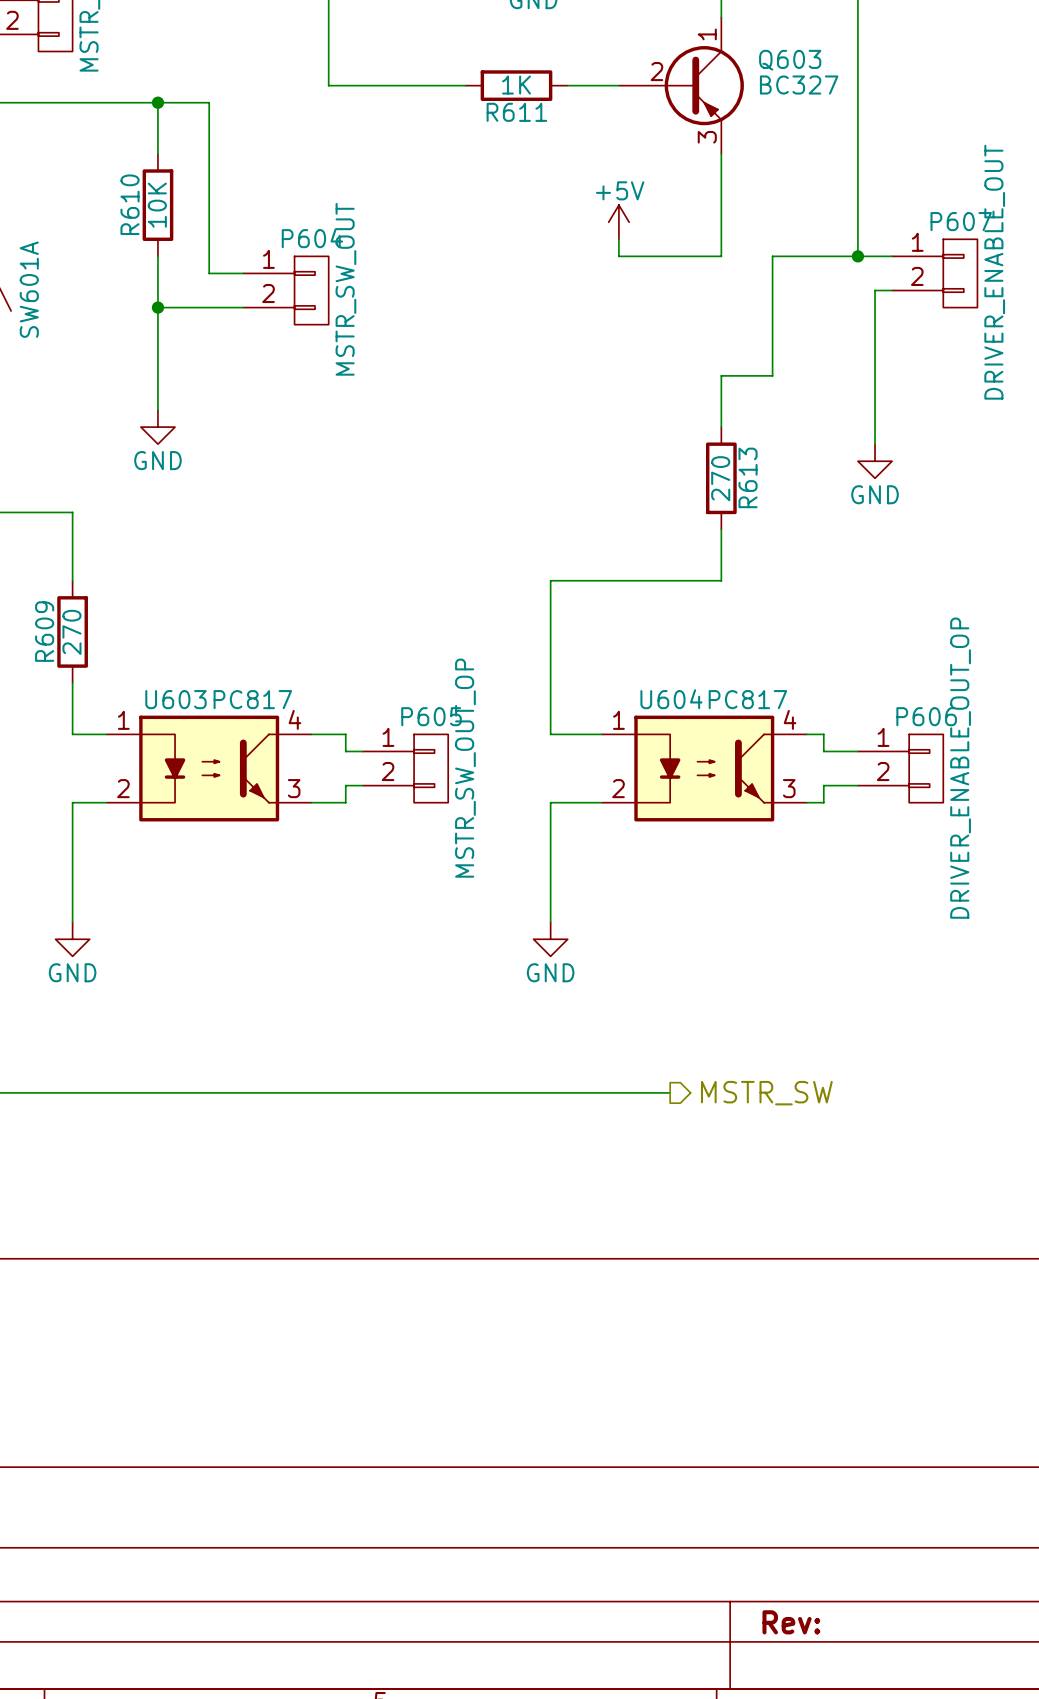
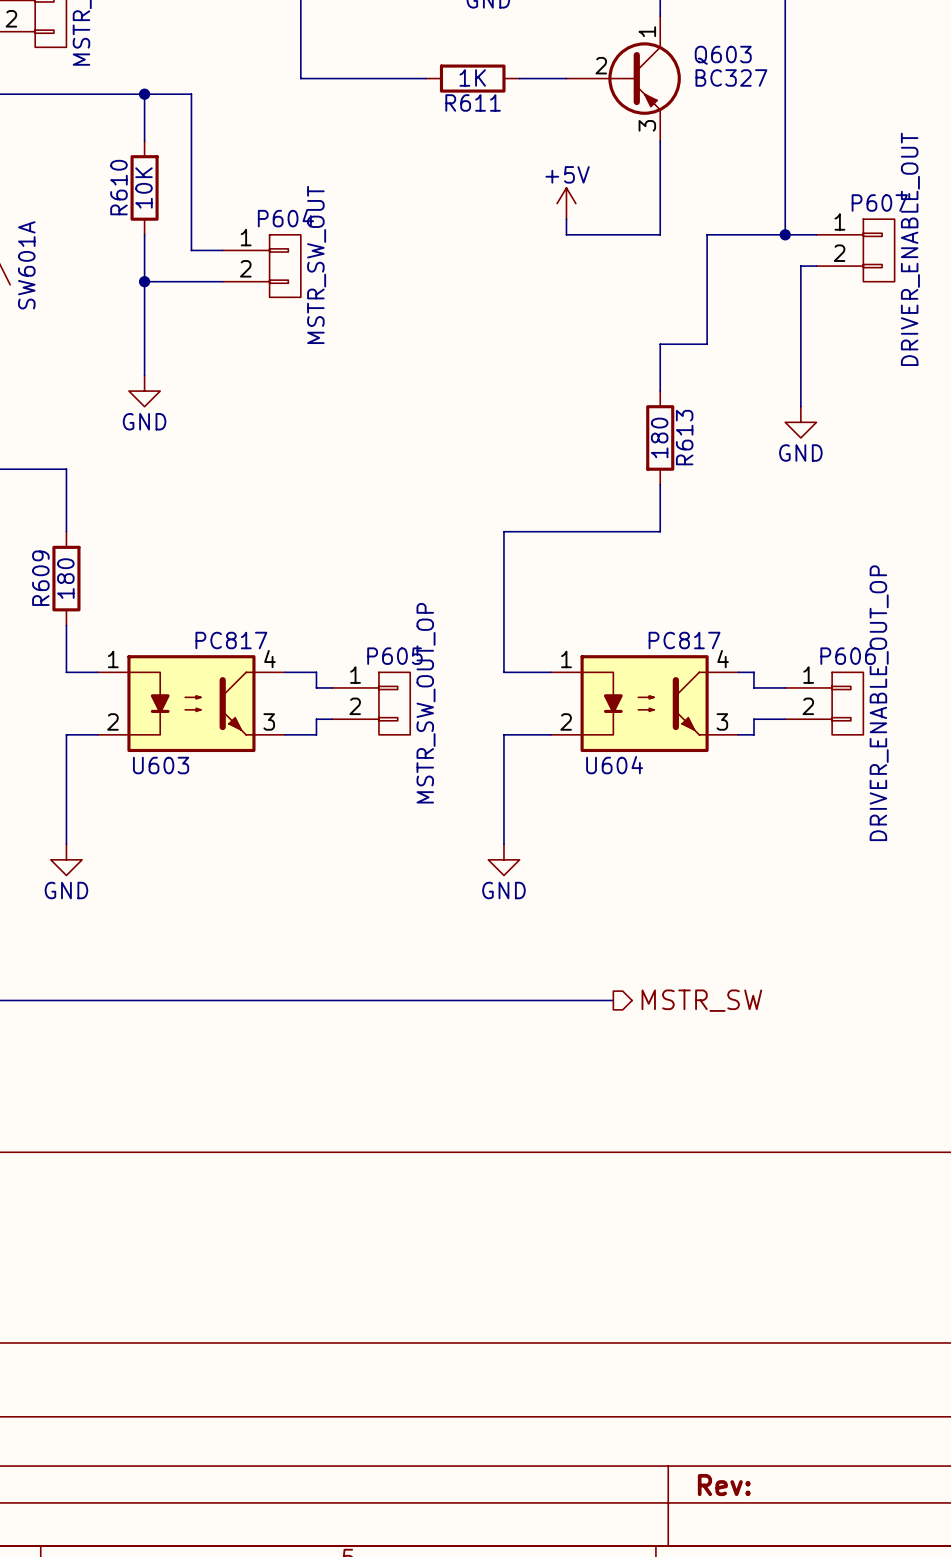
R613 value: 270 (720, 478) -> 180 (659, 437)
R609 value: 270 (71, 632) -> 180 (65, 578)
U603 name position: U603 (175, 699) -> U603 (161, 765)
U604 name position: U604 (671, 699) -> U604 (614, 765)

